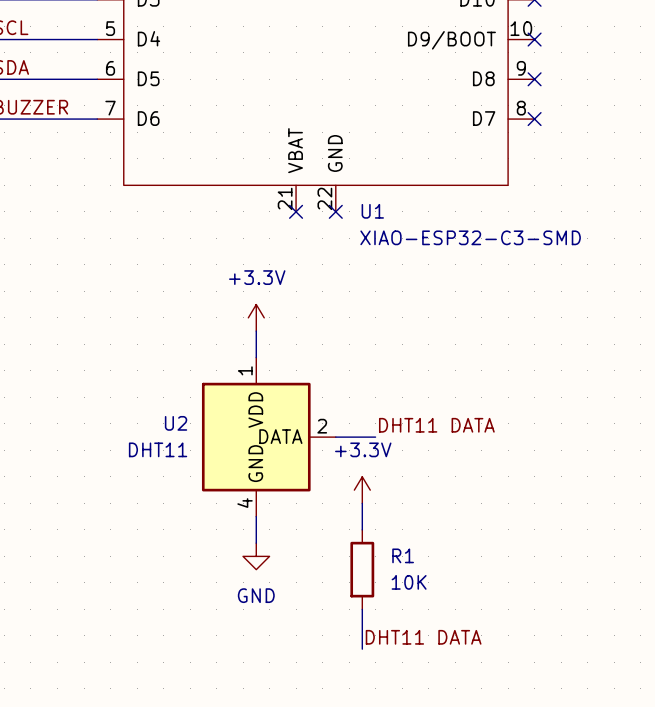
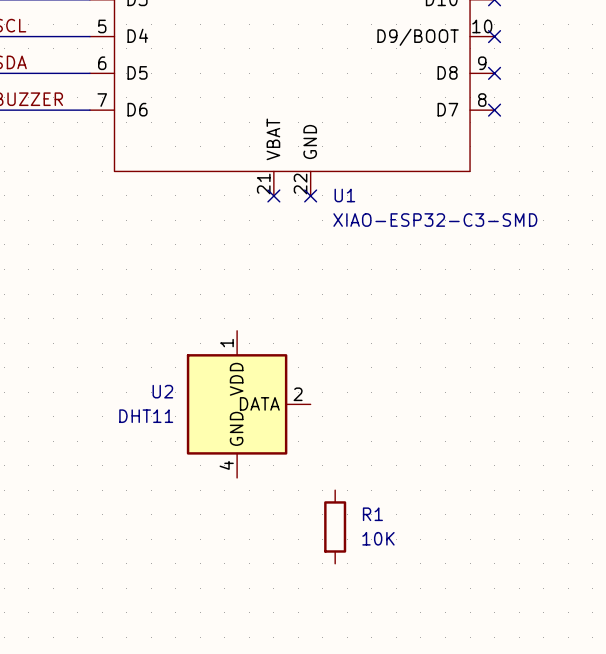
power symbol: +3.3V (256, 317) -> none
wire: (256, 331) (256, 357) -> none
label: DHT11 DATA (436, 425) -> none
wire: (335, 437) (375, 437) -> none
power symbol: +3.3V (362, 490) -> none
wire: (362, 503) (362, 529) -> none
wire: (256, 516) (256, 543) -> none
power symbol: GND (256, 556) -> none
wire: (362, 609) (362, 649) -> none
label: DHT11 DATA (423, 637) -> none

